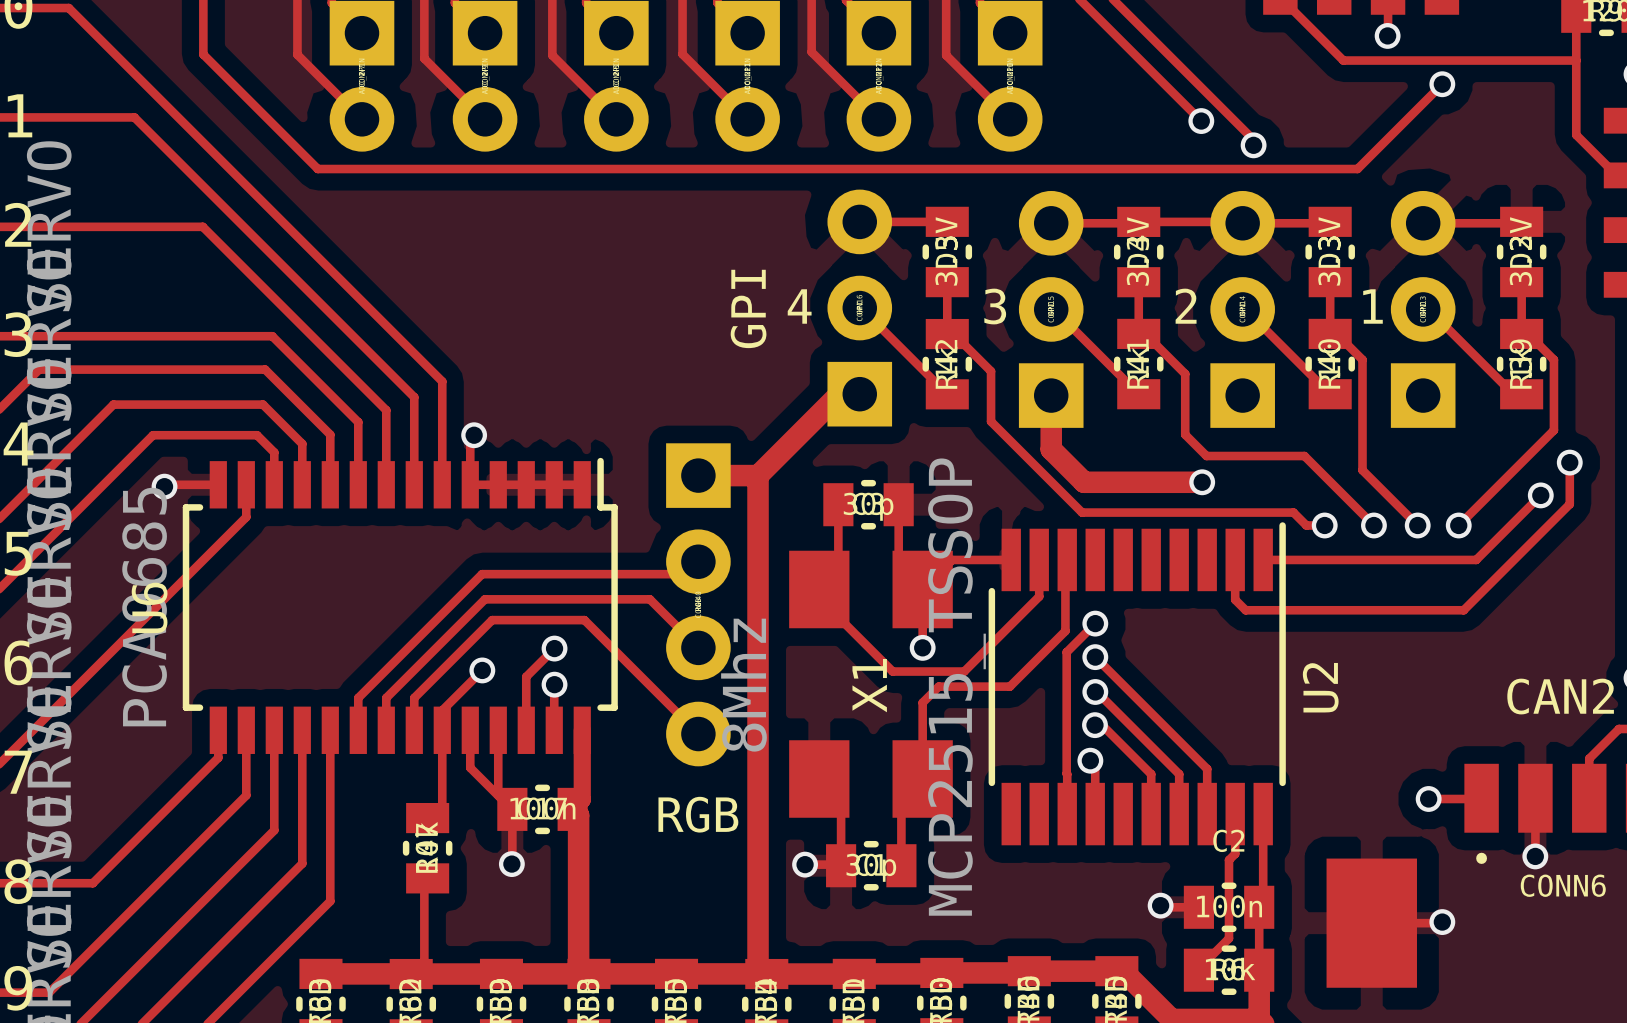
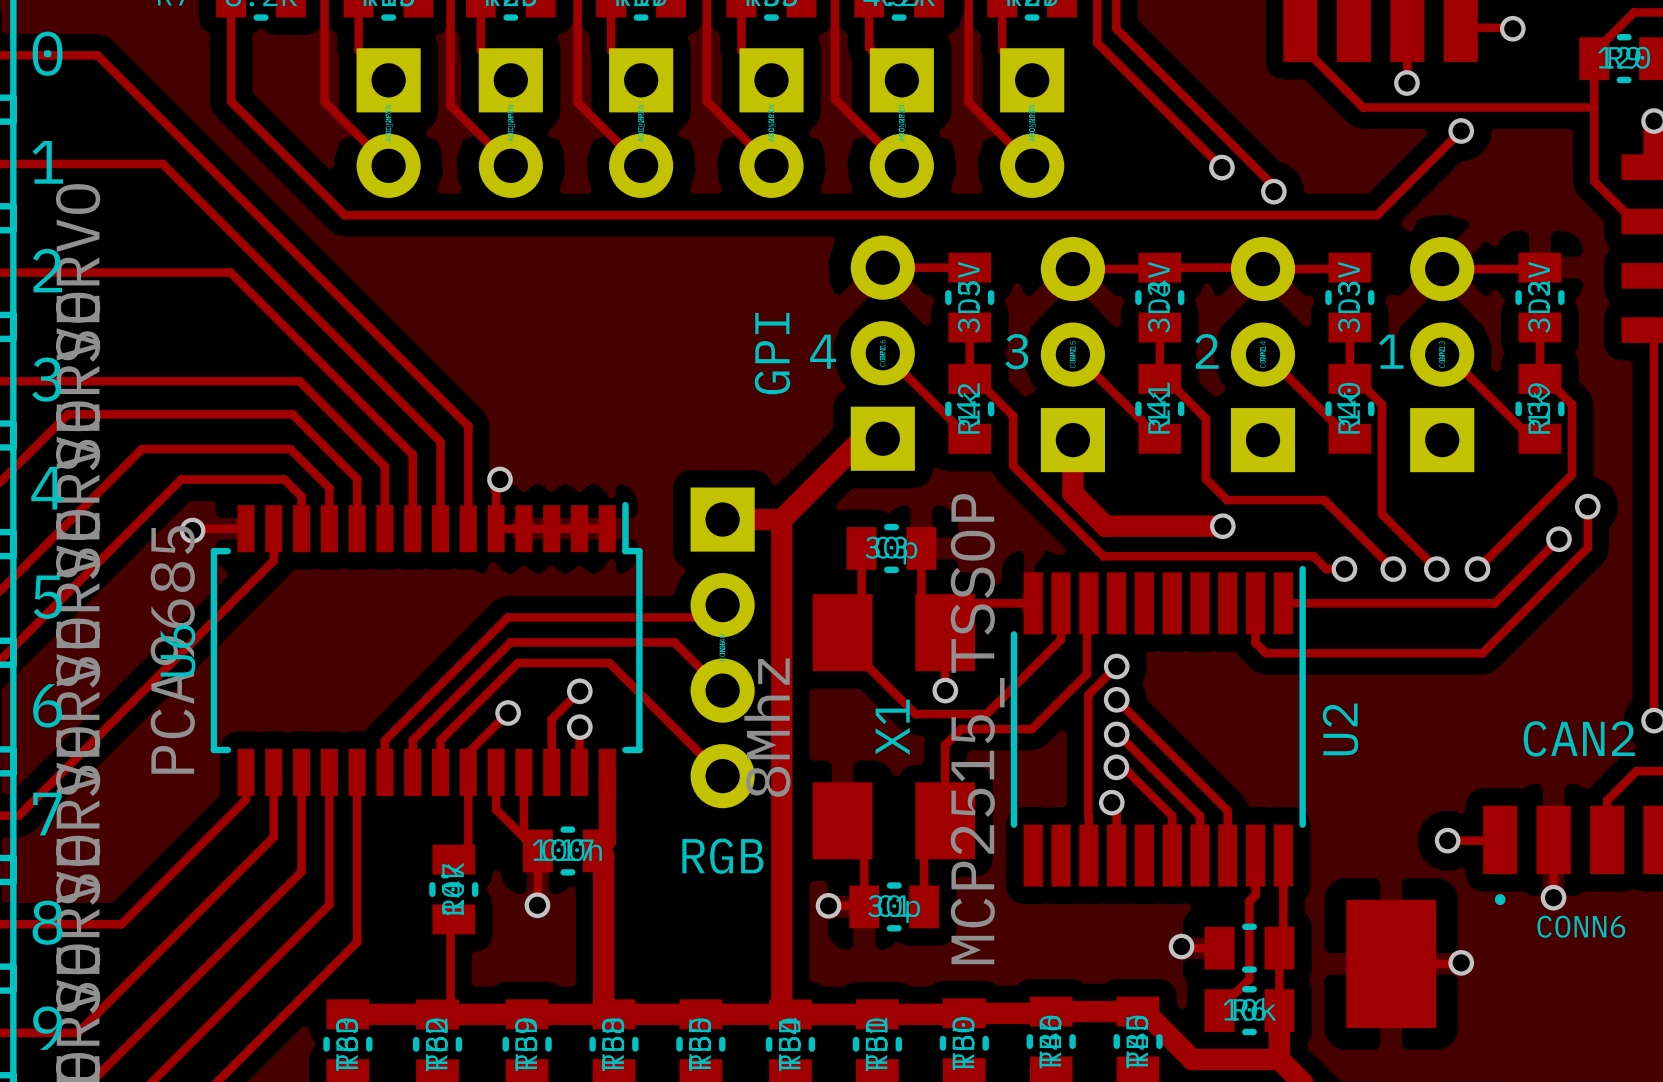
C2 name: C2 (1228, 840) -> none
C2 value: 100n (1229, 906) -> none

